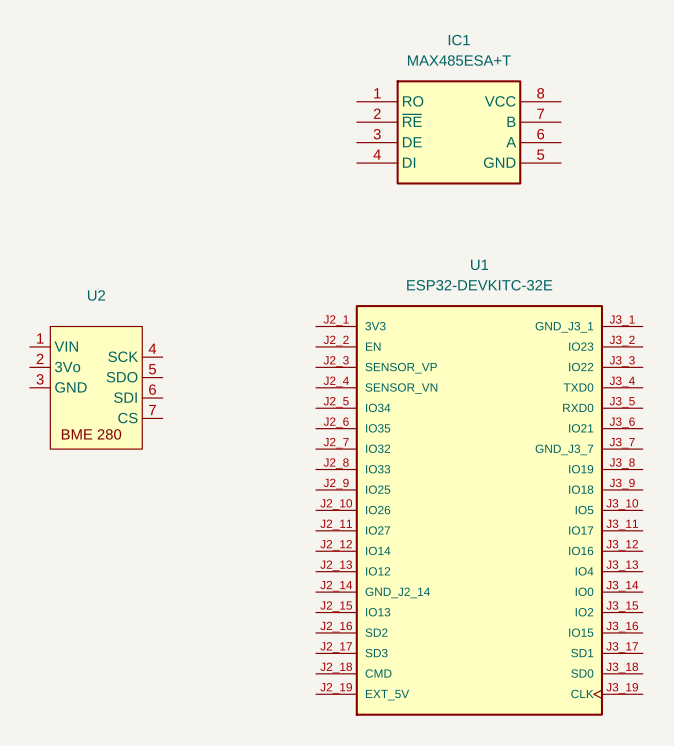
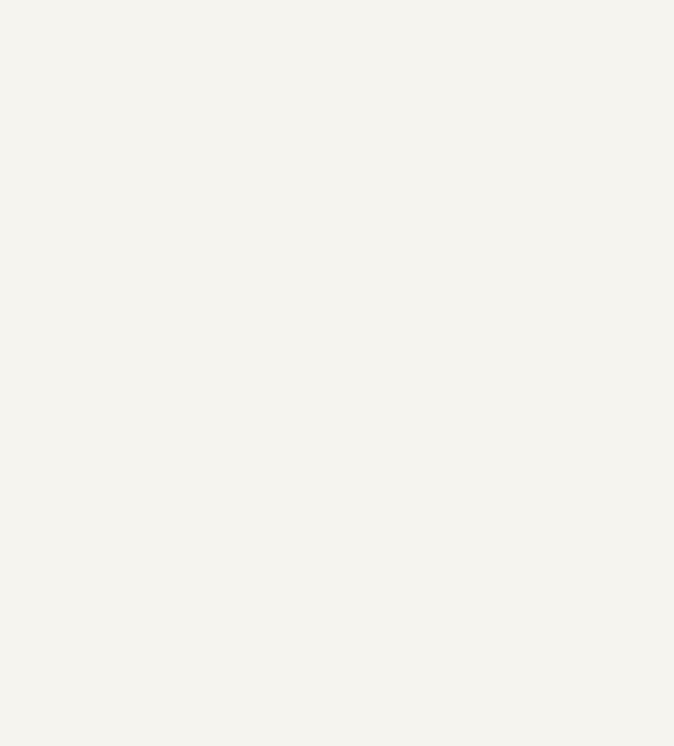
IC1: MAX485ESA+T (458, 132) -> none
U2: (96, 387) -> none
U1: ESP32-DEVKITC-32E (479, 510) -> none

